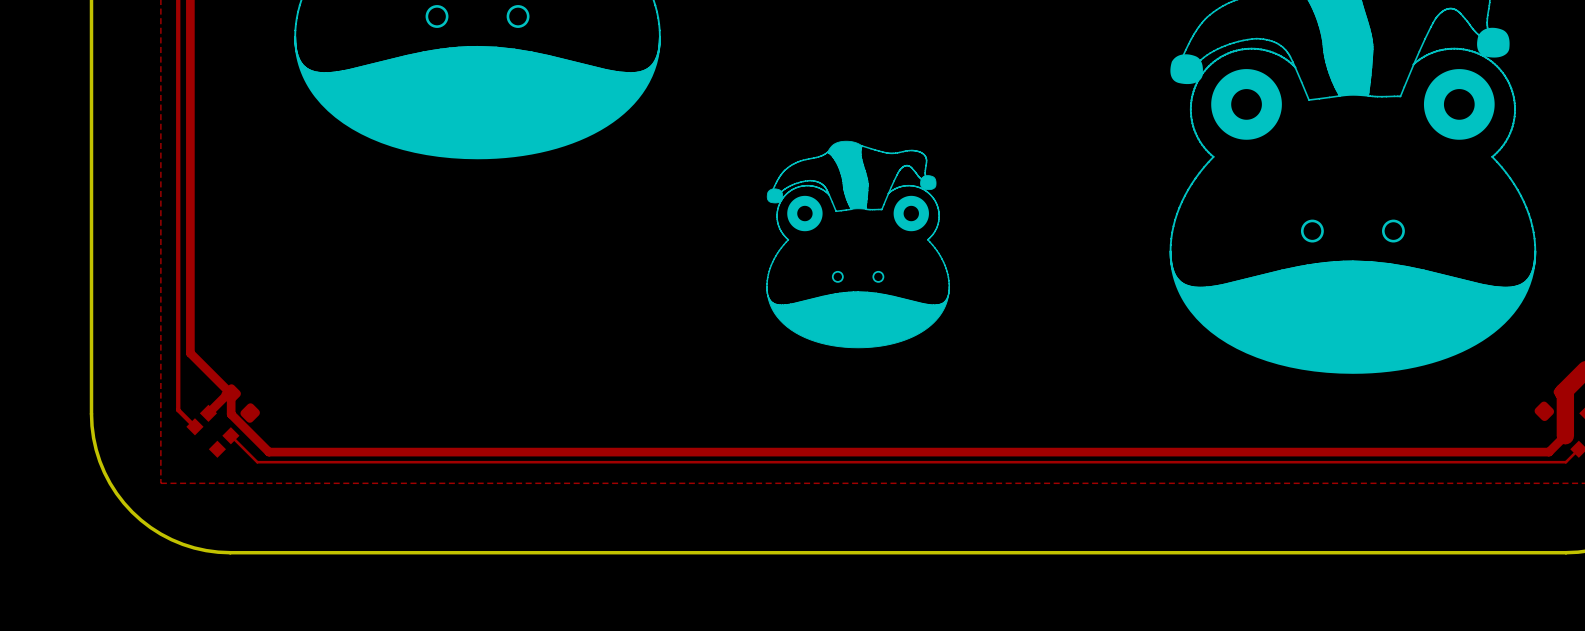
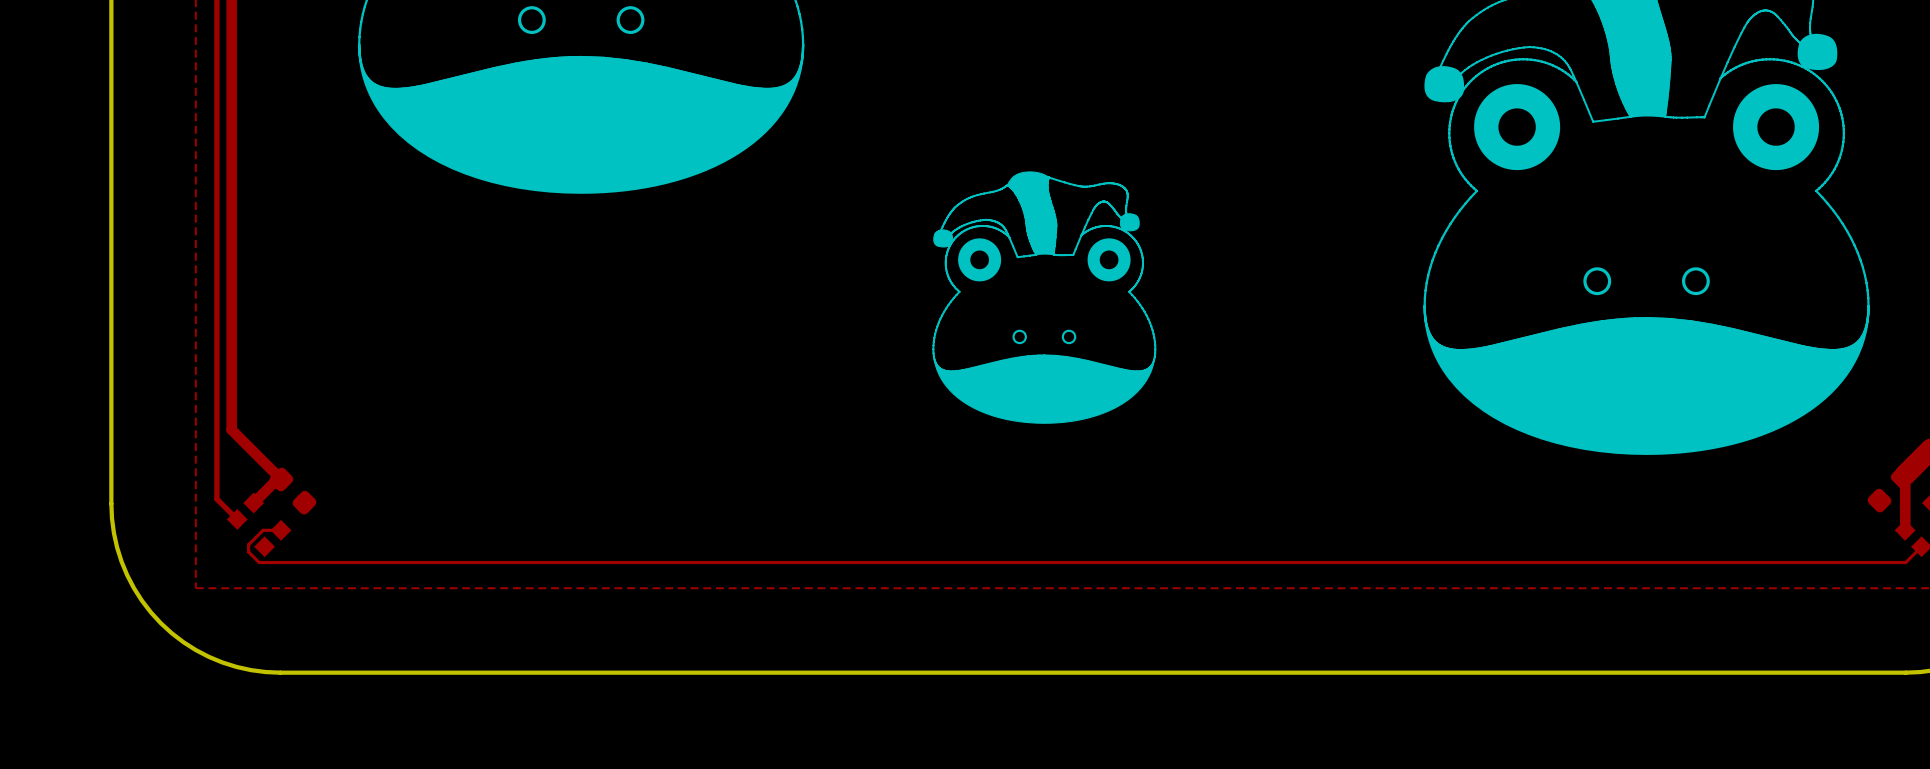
top track: (1565, 390) (1563, 392) (1565, 394) (1565, 435) (1549, 452) (268, 452) (231, 414) (231, 394) -> (1905, 474) (1905, 530)
top track: (230, 435) (257, 462) -> (281, 530) (263, 530) (248, 544) (248, 551) (259, 562) (313, 562)

